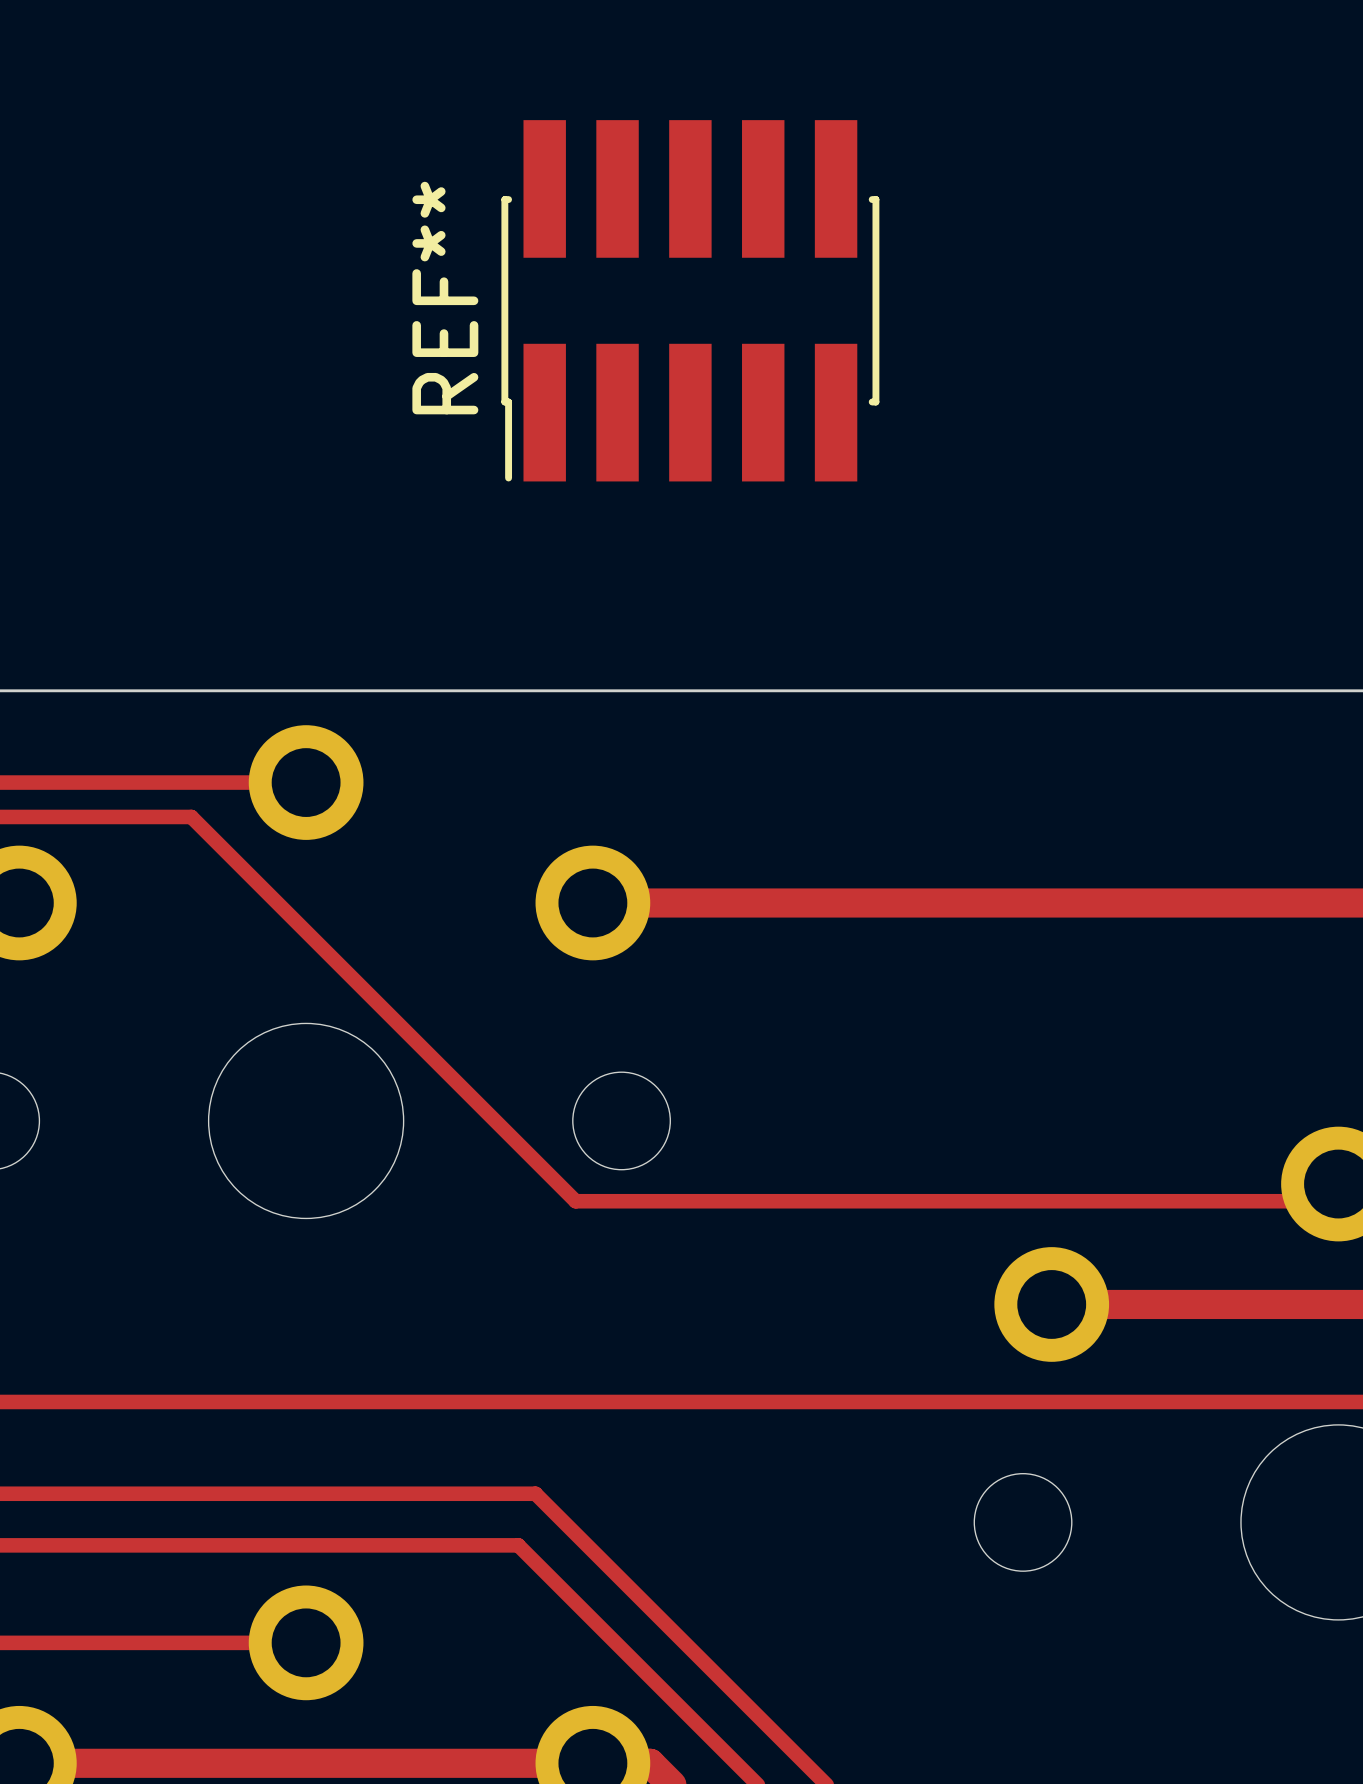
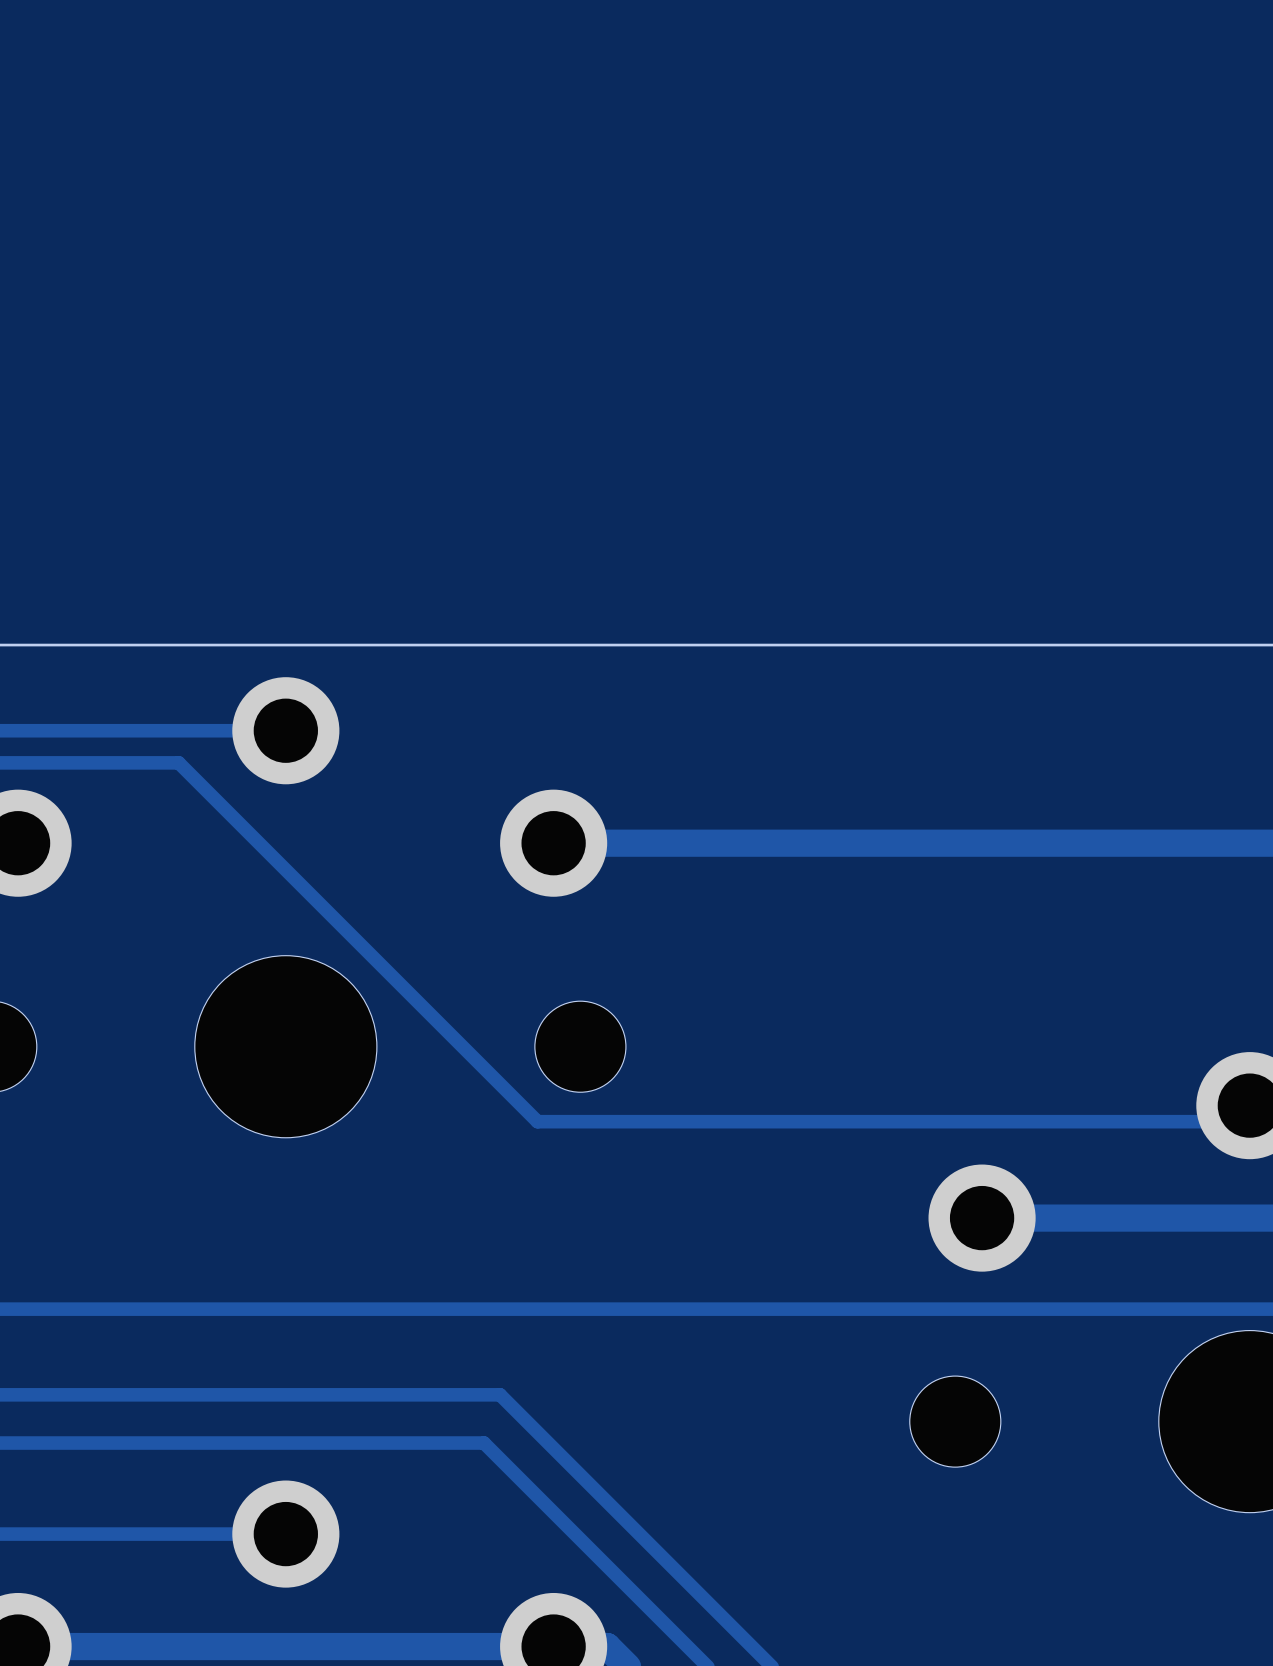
REF**: (690, 300) -> none

